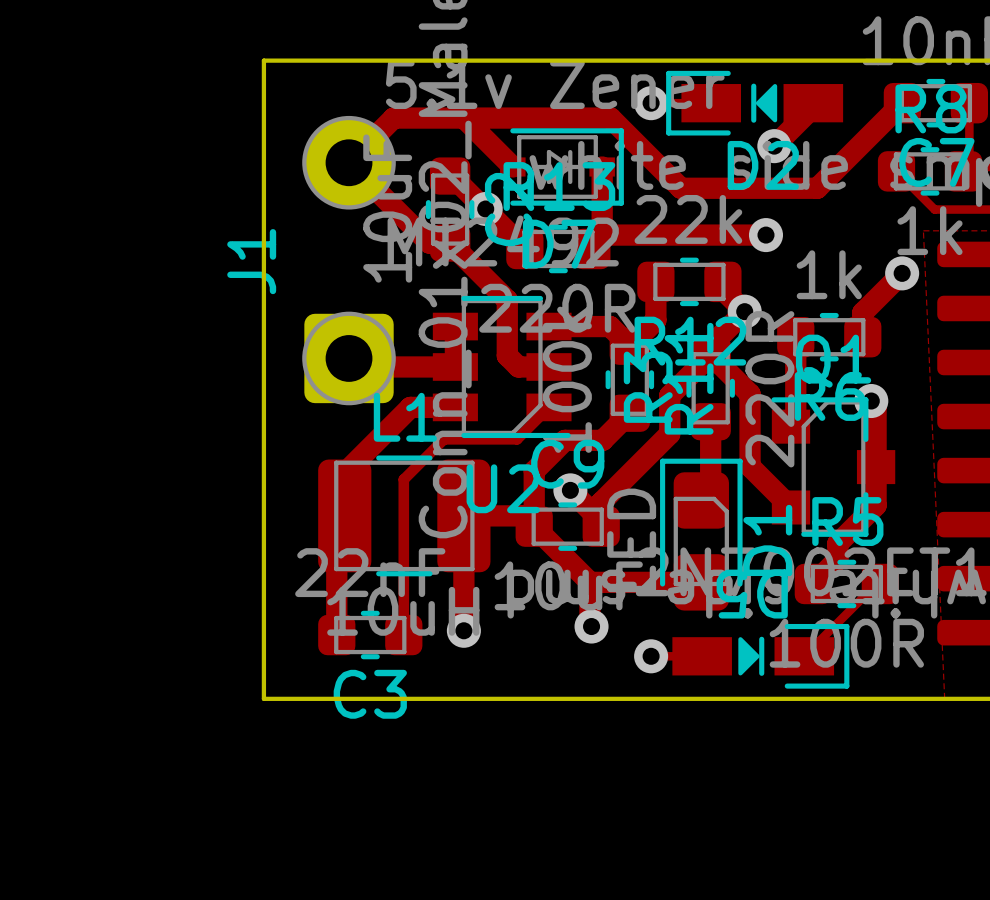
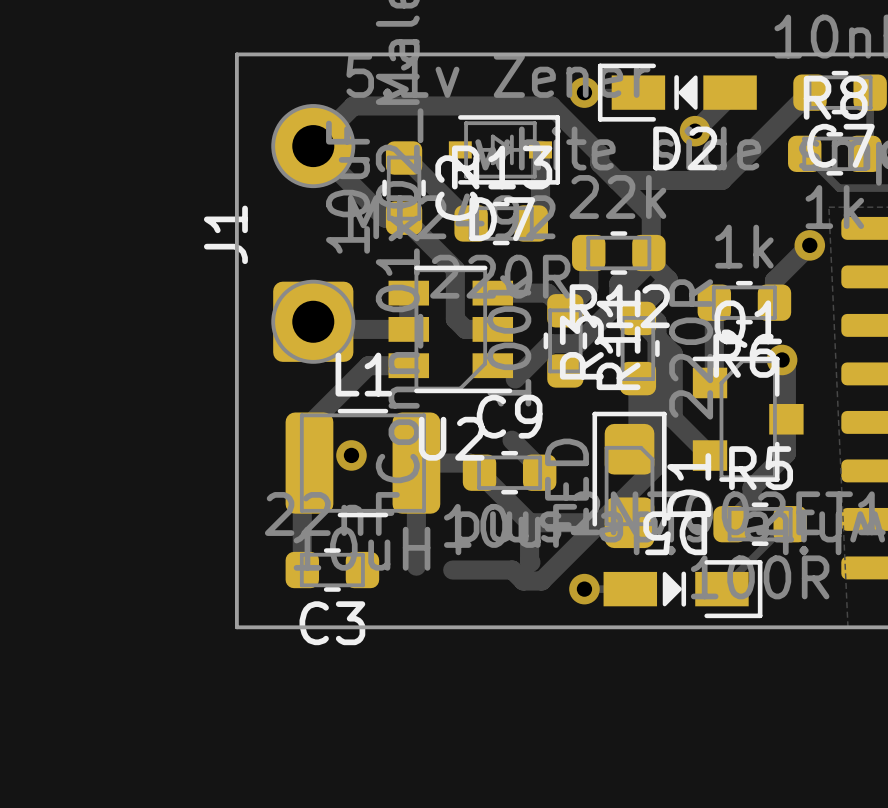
track: (463, 118) (512, 167) -> none
track: (610, 118) (680, 188) (817, 188) -> (616, 180) (722, 180) (733, 169)
track: none -> (548, 105) (551, 105) (599, 154) (599, 163) (651, 214) (651, 260) (628, 283) (618, 283)
via: (485, 209) -> none
track: (765, 235) (605, 235) (591, 248) -> none
via: (765, 235) -> none
via: (744, 311) -> none
track: none -> (618, 283) (657, 321) (657, 465) (541, 581) (523, 581) (512, 570) (452, 570)
track: none -> (618, 283) (618, 302) (577, 343) (550, 343) (515, 379)
track: (710, 354) (669, 395) (669, 433) (601, 502) (601, 526) -> none
track: (548, 407) (517, 439) (444, 439) (403, 479) (403, 635) -> none
track: (629, 413) (602, 440) (564, 440) (534, 471) (534, 526) -> none
via: (570, 490) -> none
via: none -> (351, 455)
via: (591, 626) -> none
via: (463, 630) -> none

